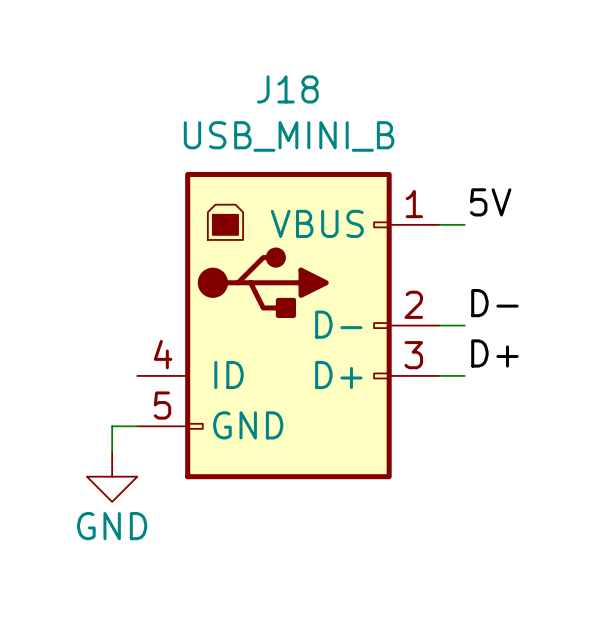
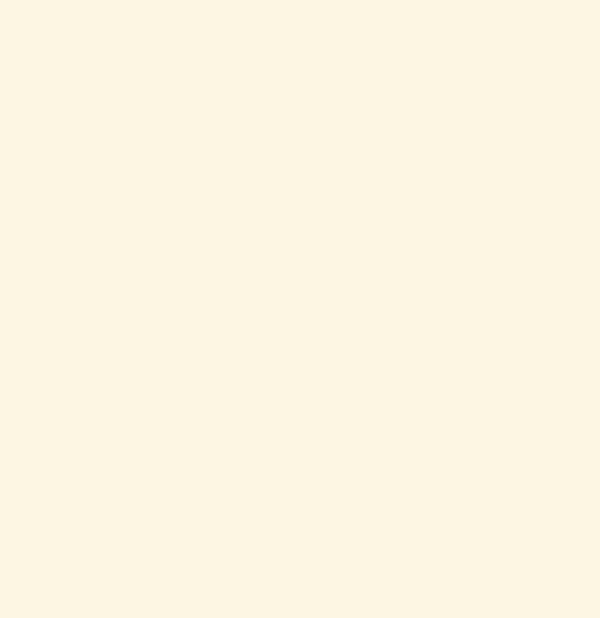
label: 5V (490, 202) -> none
wire: (439, 224) (464, 224) -> none
label: D- (494, 303) -> none
J18: USB_MINI_B (288, 325) -> none
wire: (439, 325) (464, 325) -> none
label: D+ (494, 353) -> none
wire: (439, 375) (464, 375) -> none
wire: (137, 426) (112, 426) (112, 451) -> none
power symbol: GND (112, 476) -> none

